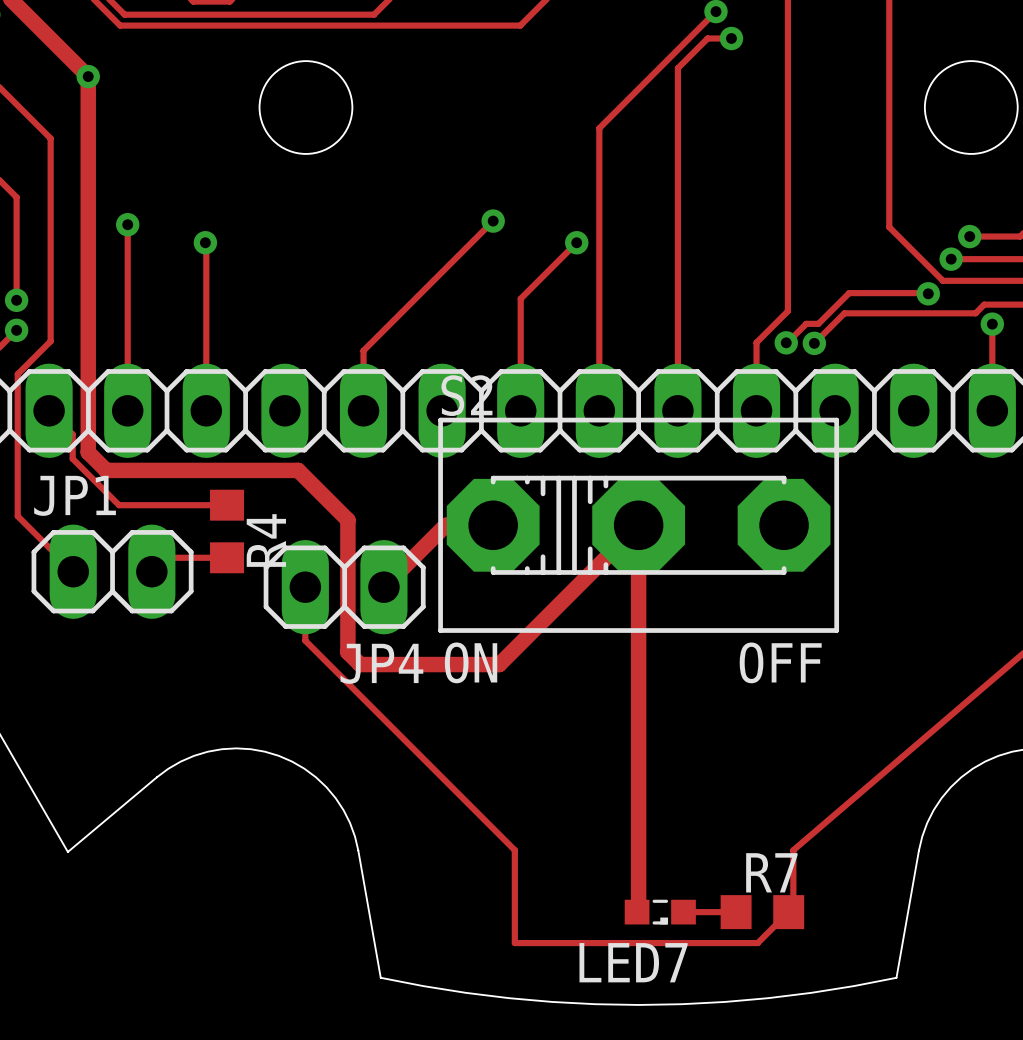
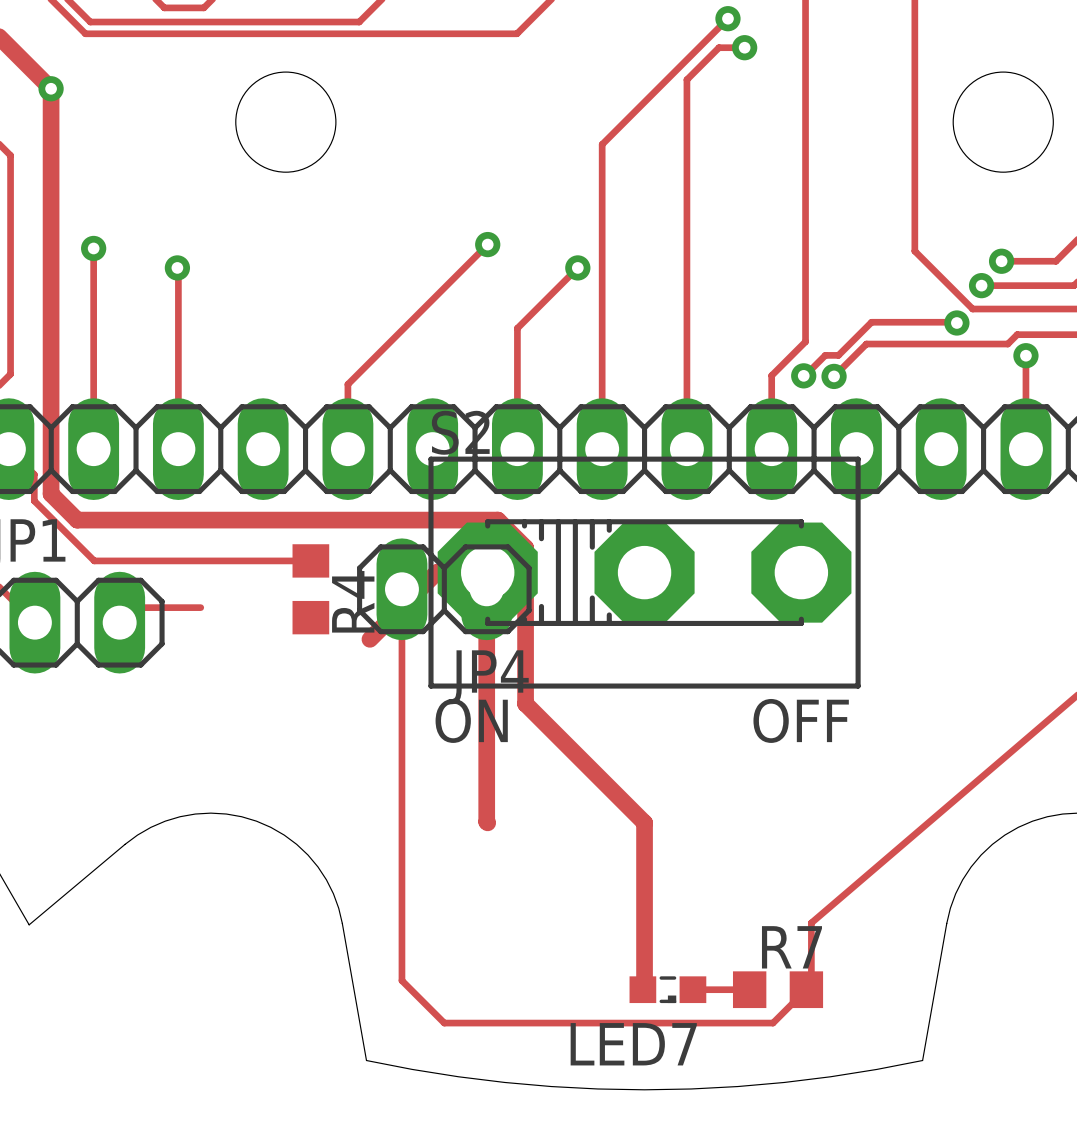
track: (106, 470) (298, 470) (347, 520) (347, 652) (360, 664) (499, 664) (638, 525) (638, 757) -> (70, 513) (77, 520) (497, 520) (525, 547) (525, 703) (644, 822)
track: (119, 505) (227, 505) -> (84, 550) (94, 560) (310, 560)
R4 position: (227, 531) -> (310, 589)
track: none -> (486, 589) (487, 822)
track: (305, 587) (305, 640) (514, 850) (514, 943) -> (401, 589) (401, 980) (444, 1023) (511, 1023)
JP4 position: (344, 587) -> (444, 589)

